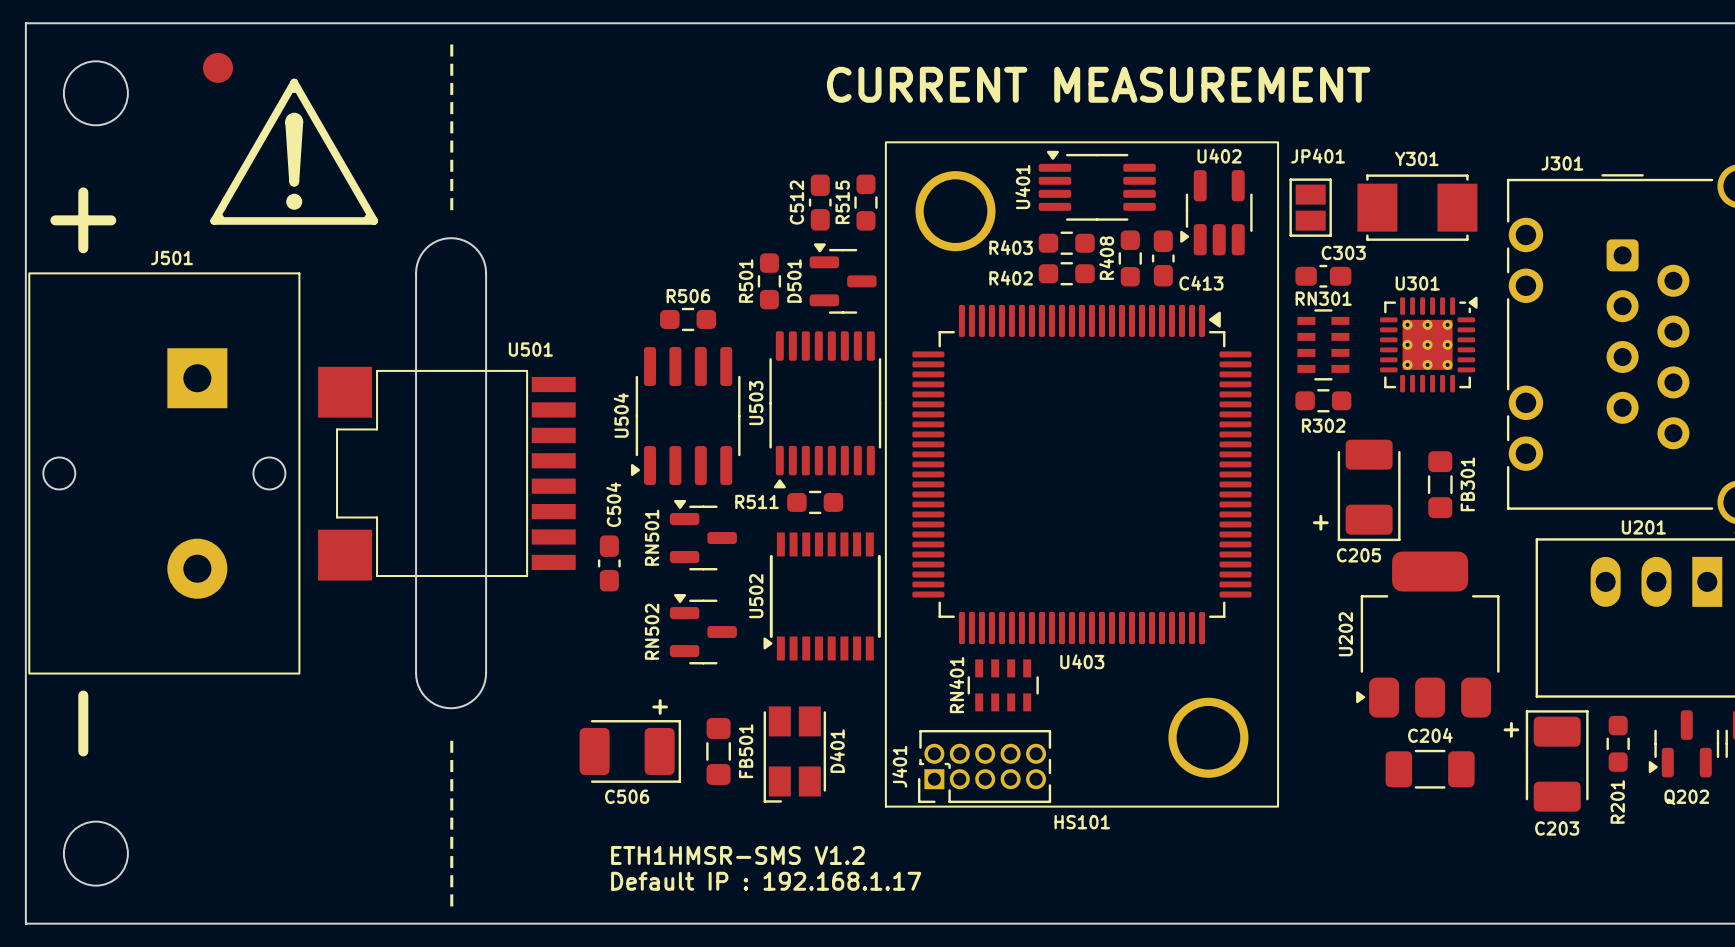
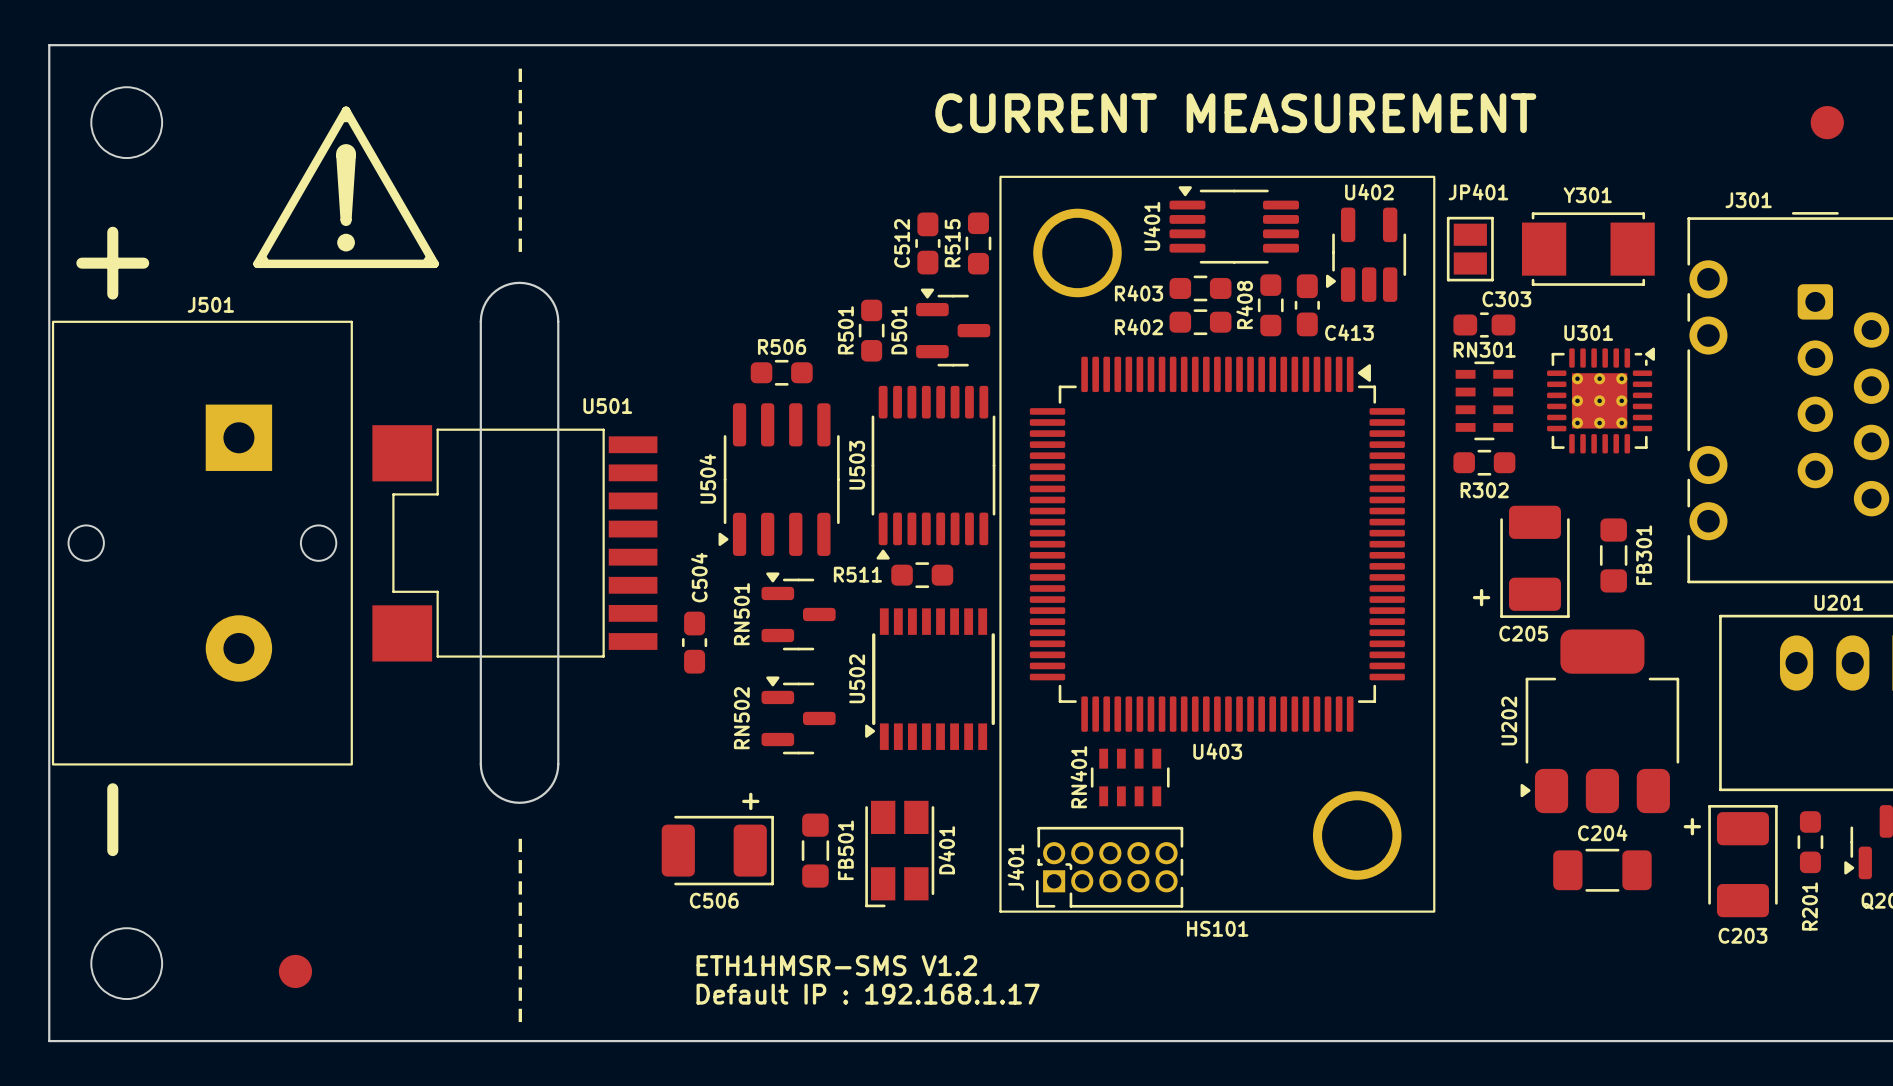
part: (217, 67) -> none
part: none -> (1827, 122)
part: none -> (295, 971)

